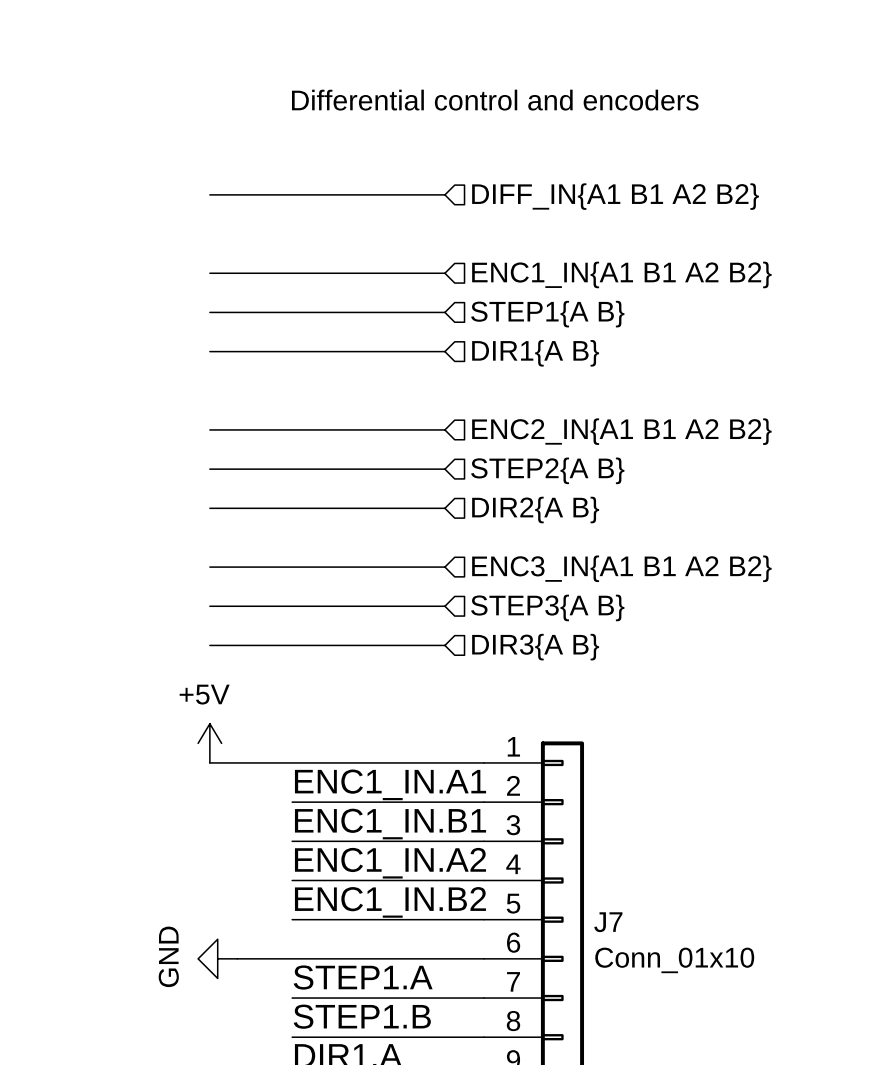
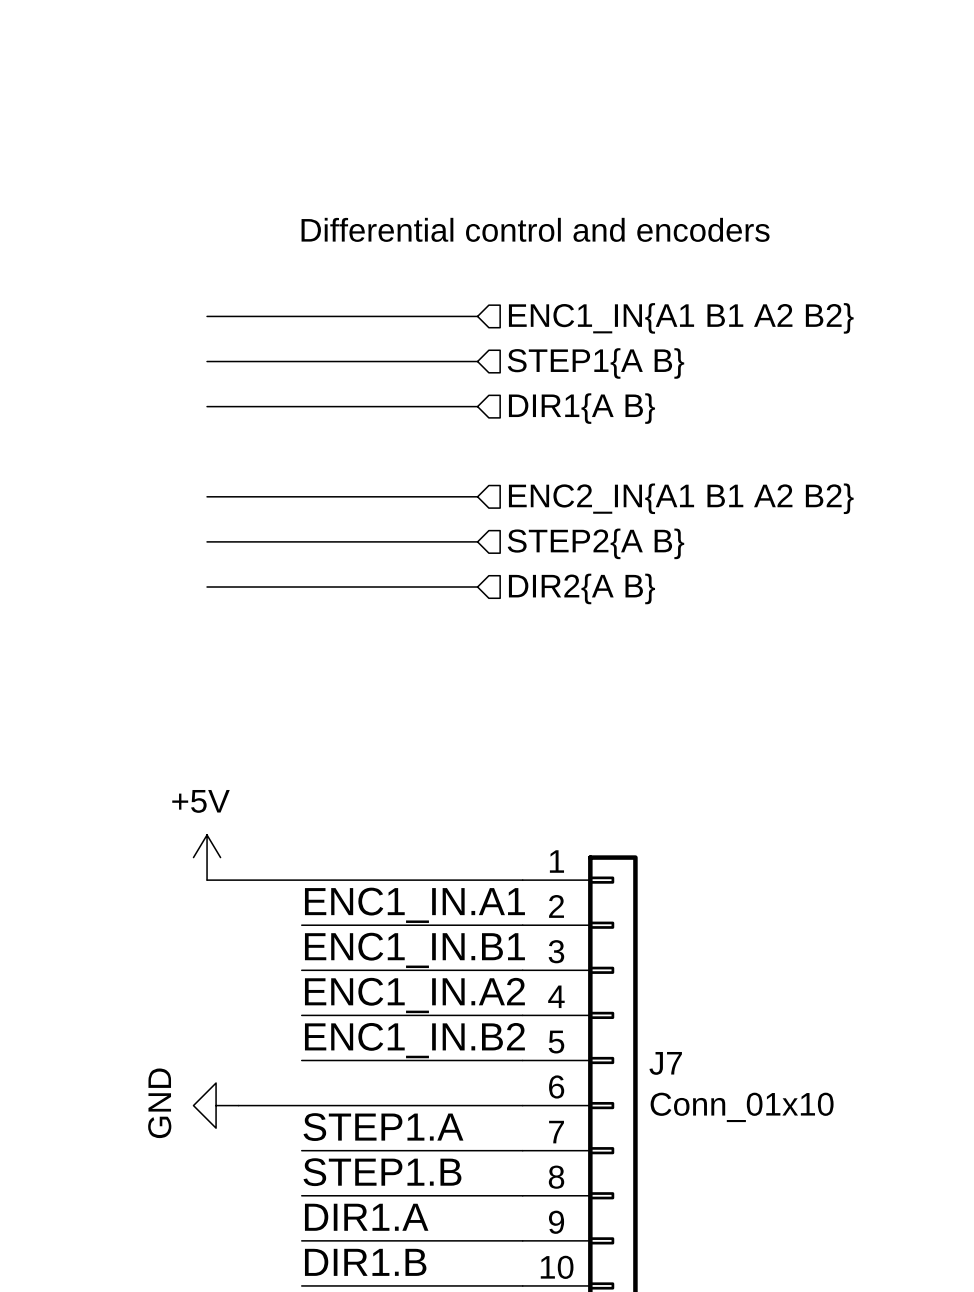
text position: Differential control and encoders (495, 100) -> Differential control and encoders (535, 229)
bus: (209, 194) (444, 194) -> none
hierarchical label: DIFF_IN{A1 B1 A2 B2} (615, 196) -> none
bus: (209, 567) (444, 567) -> none
hierarchical label: ENC3_IN{A1 B1 A2 B2} (621, 568) -> none
bus: (209, 606) (444, 606) -> none
hierarchical label: STEP3{A B} (547, 607) -> none
bus: (209, 645) (444, 645) -> none
hierarchical label: DIR3{A B} (535, 647) -> none

